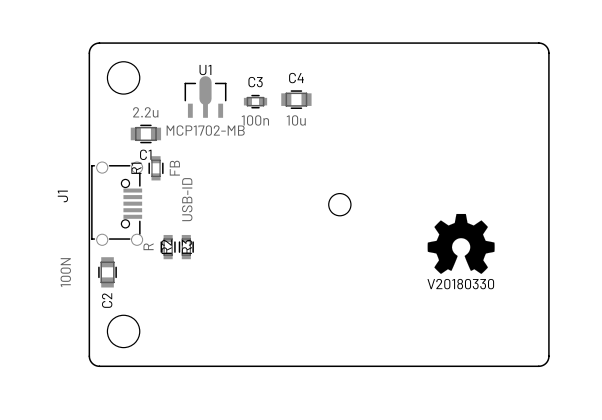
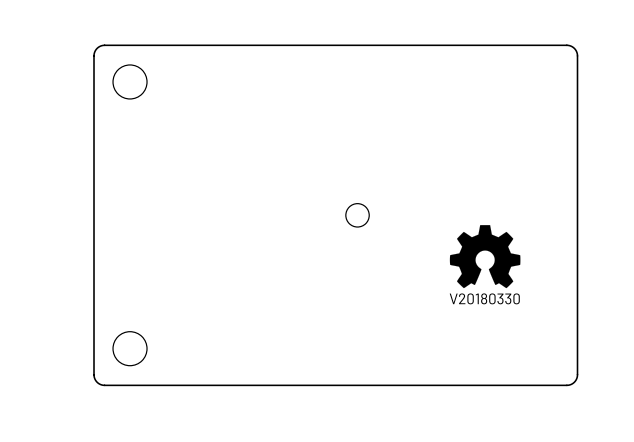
U1: MCP1702-MB (205, 96) -> none
C4: 10u (296, 99) -> none
C3: 100n (255, 101) -> none
C1: 2.2u (145, 133) -> none
R1: FB (156, 168) -> none
J1: USB-ID (117, 203) -> none
R3: R (168, 247) -> none
R2: (186, 247) -> none
C2: 100N (107, 272) -> none

